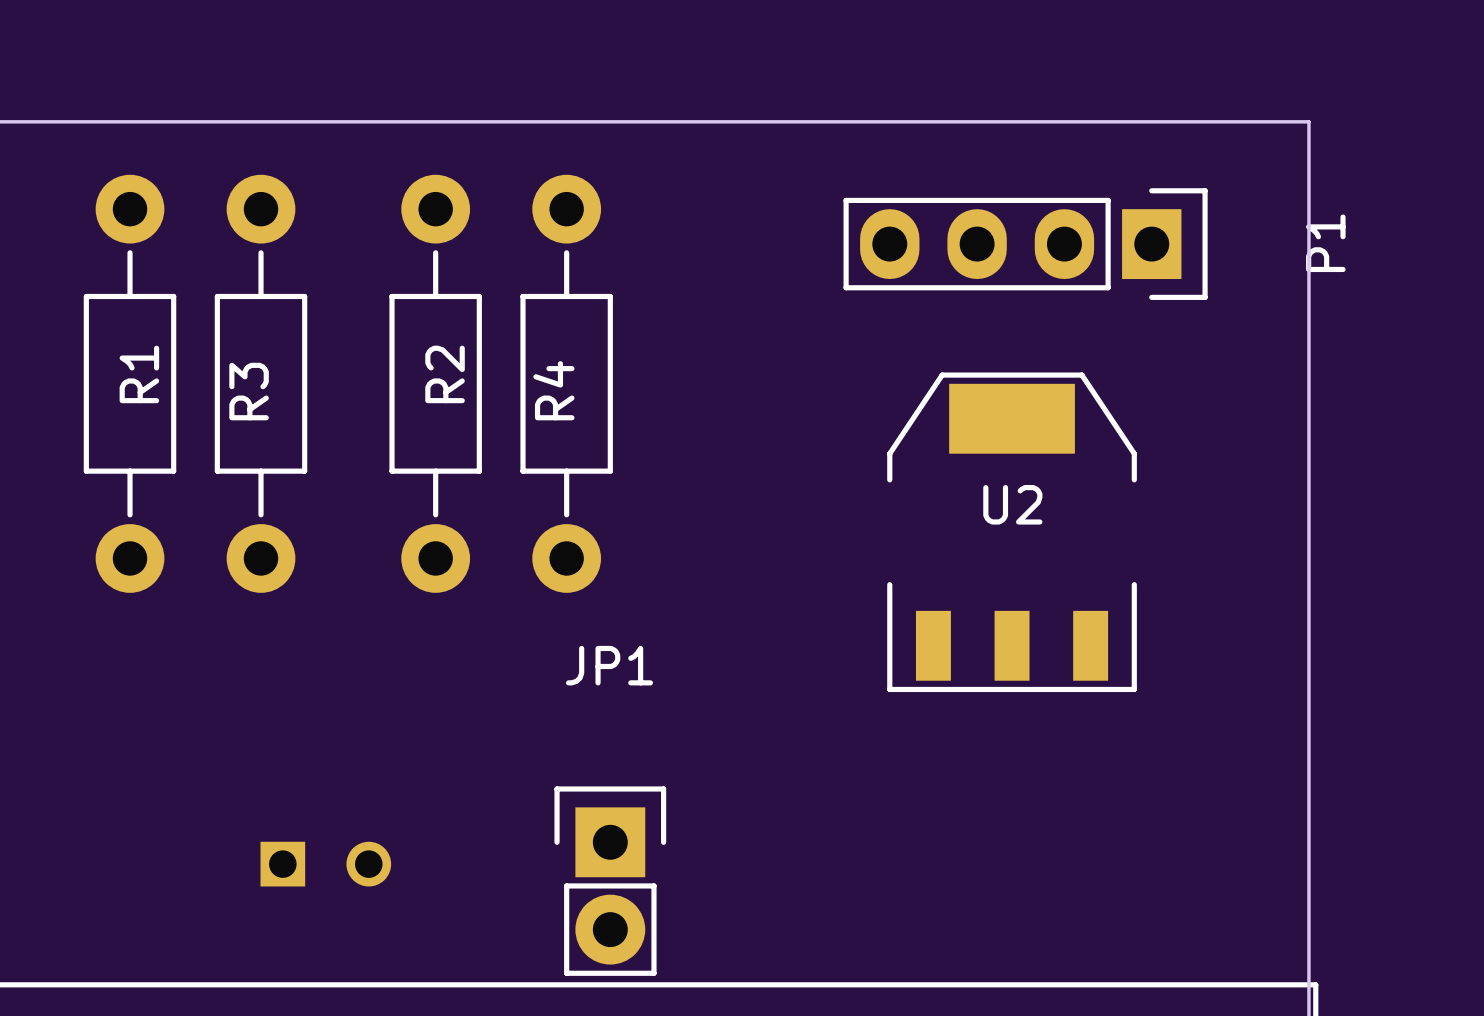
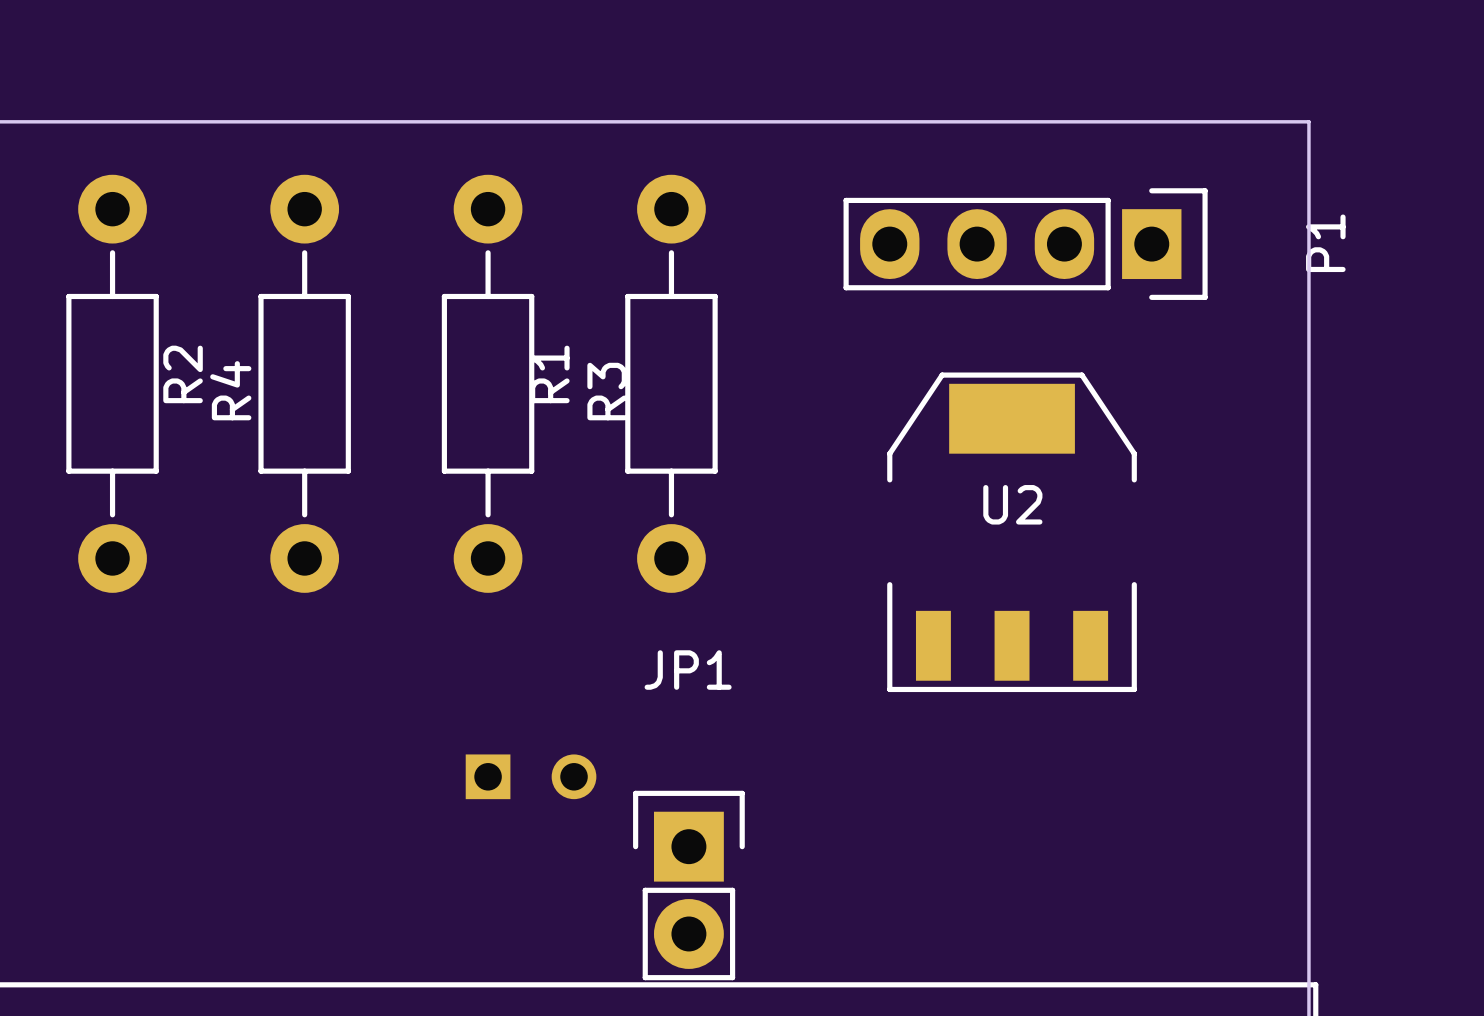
R3 position: (130, 383) -> (488, 383)
R1 position: (261, 383) -> (671, 383)
R4 position: (435, 383) -> (112, 383)
R2 position: (566, 383) -> (304, 383)
part position: (325, 864) -> (531, 776)
JP1 position: (610, 881) -> (688, 885)

